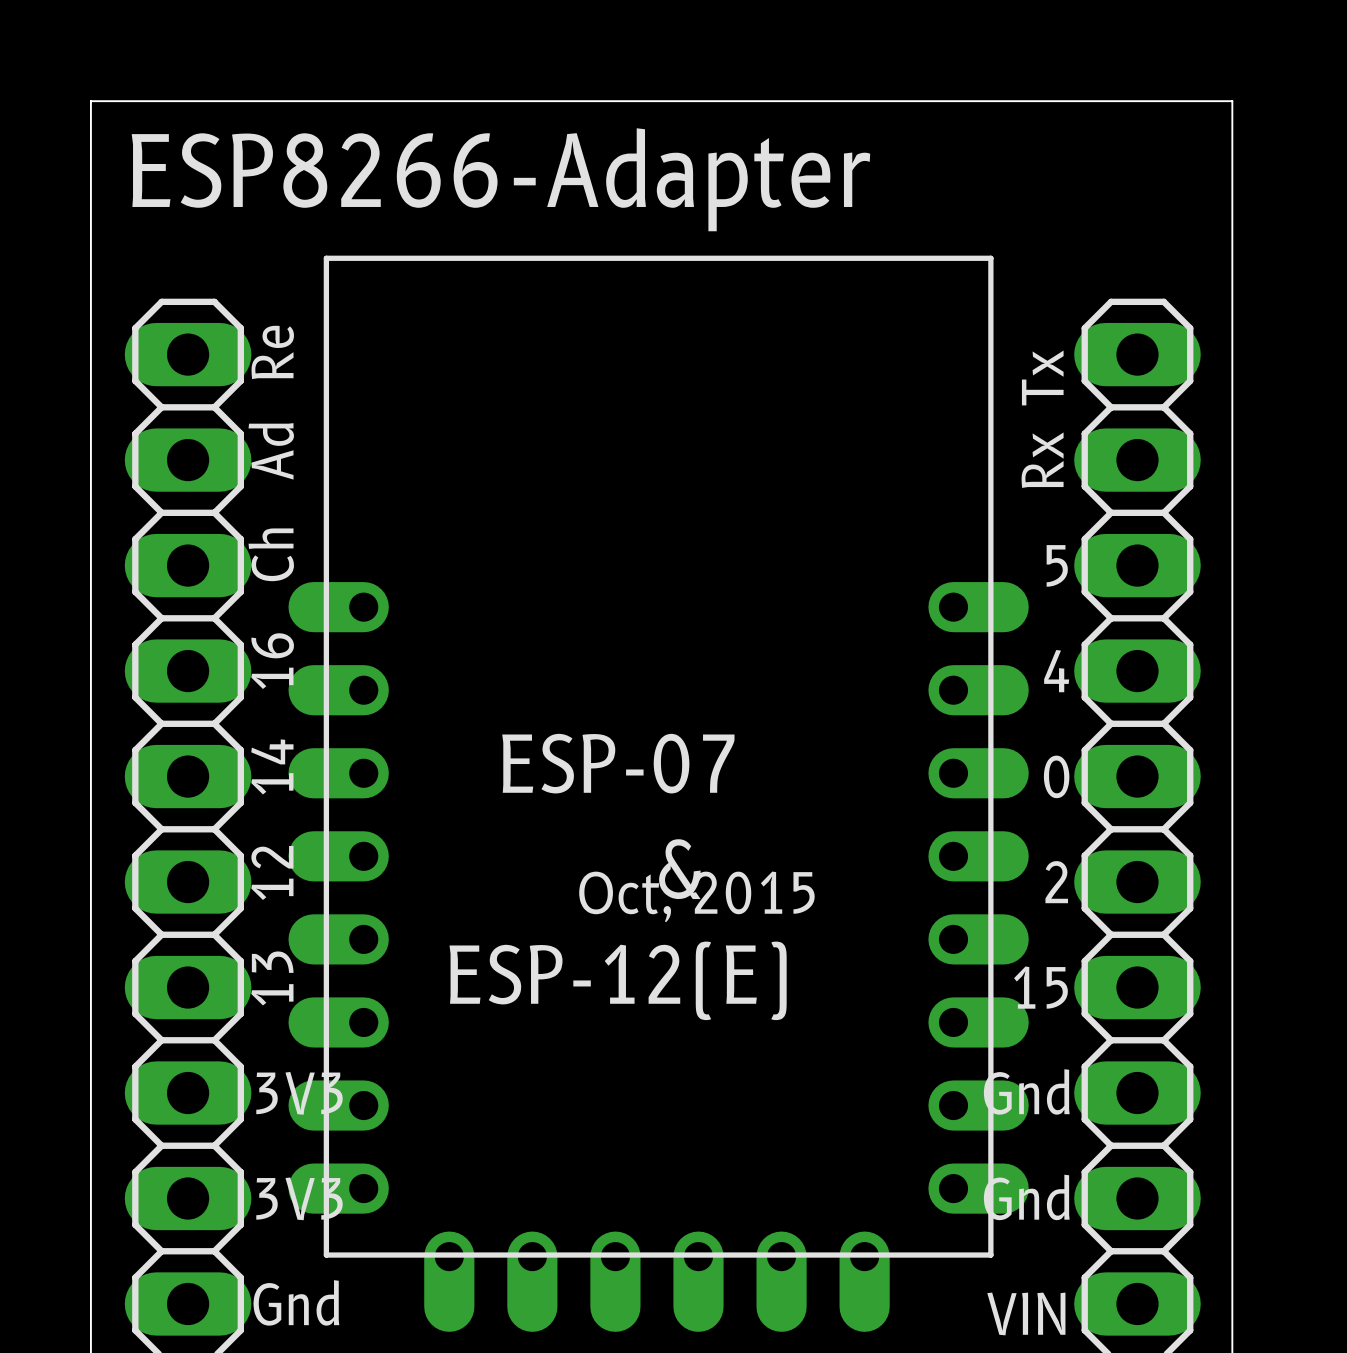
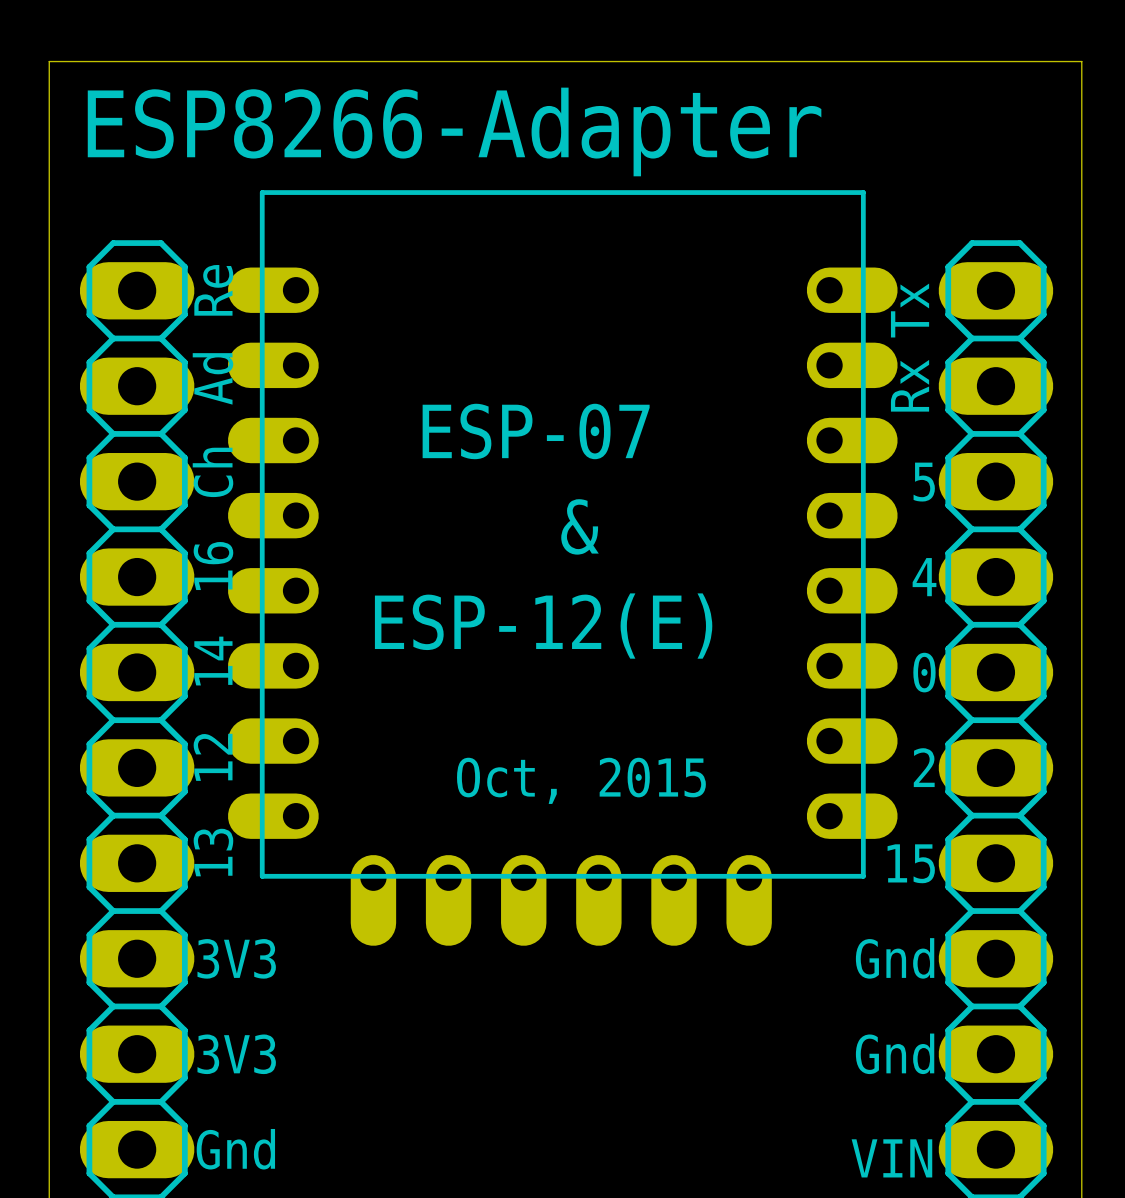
part: none -> (562, 567)
part: (658, 793) -> none

